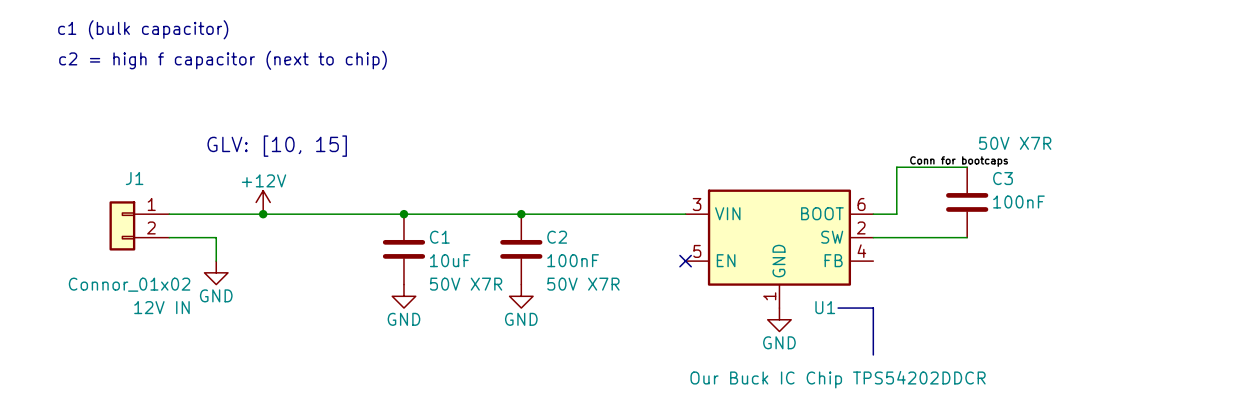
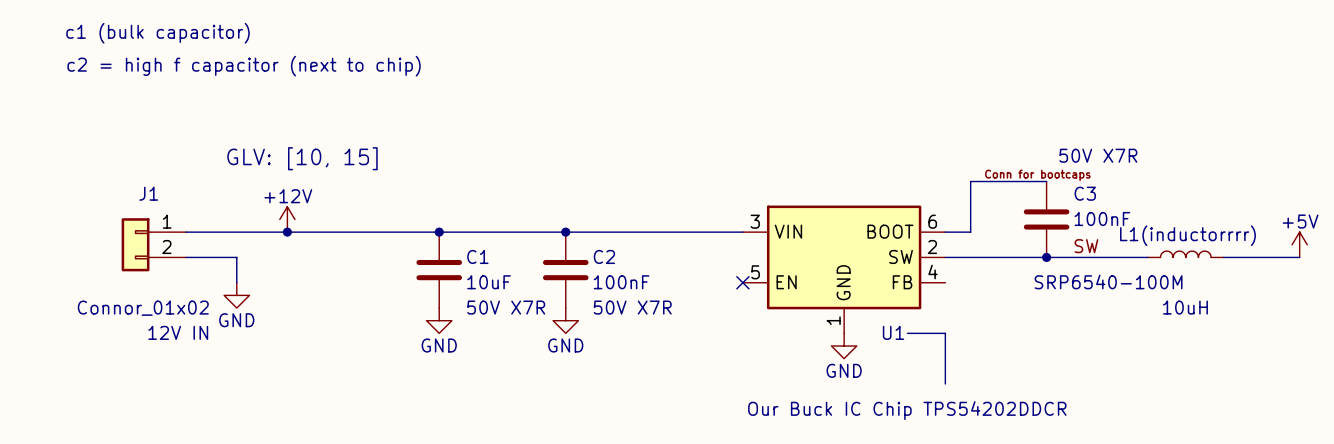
power symbol: none -> +5V (1299, 244)
label: none -> SW (1086, 246)
L1(inductorrrr): none -> SRP6540-100M (1185, 254)
wire: none -> (1046, 257) (1147, 257)
junction: none -> (1046, 257)
wire: none -> (1223, 257) (1299, 257)

